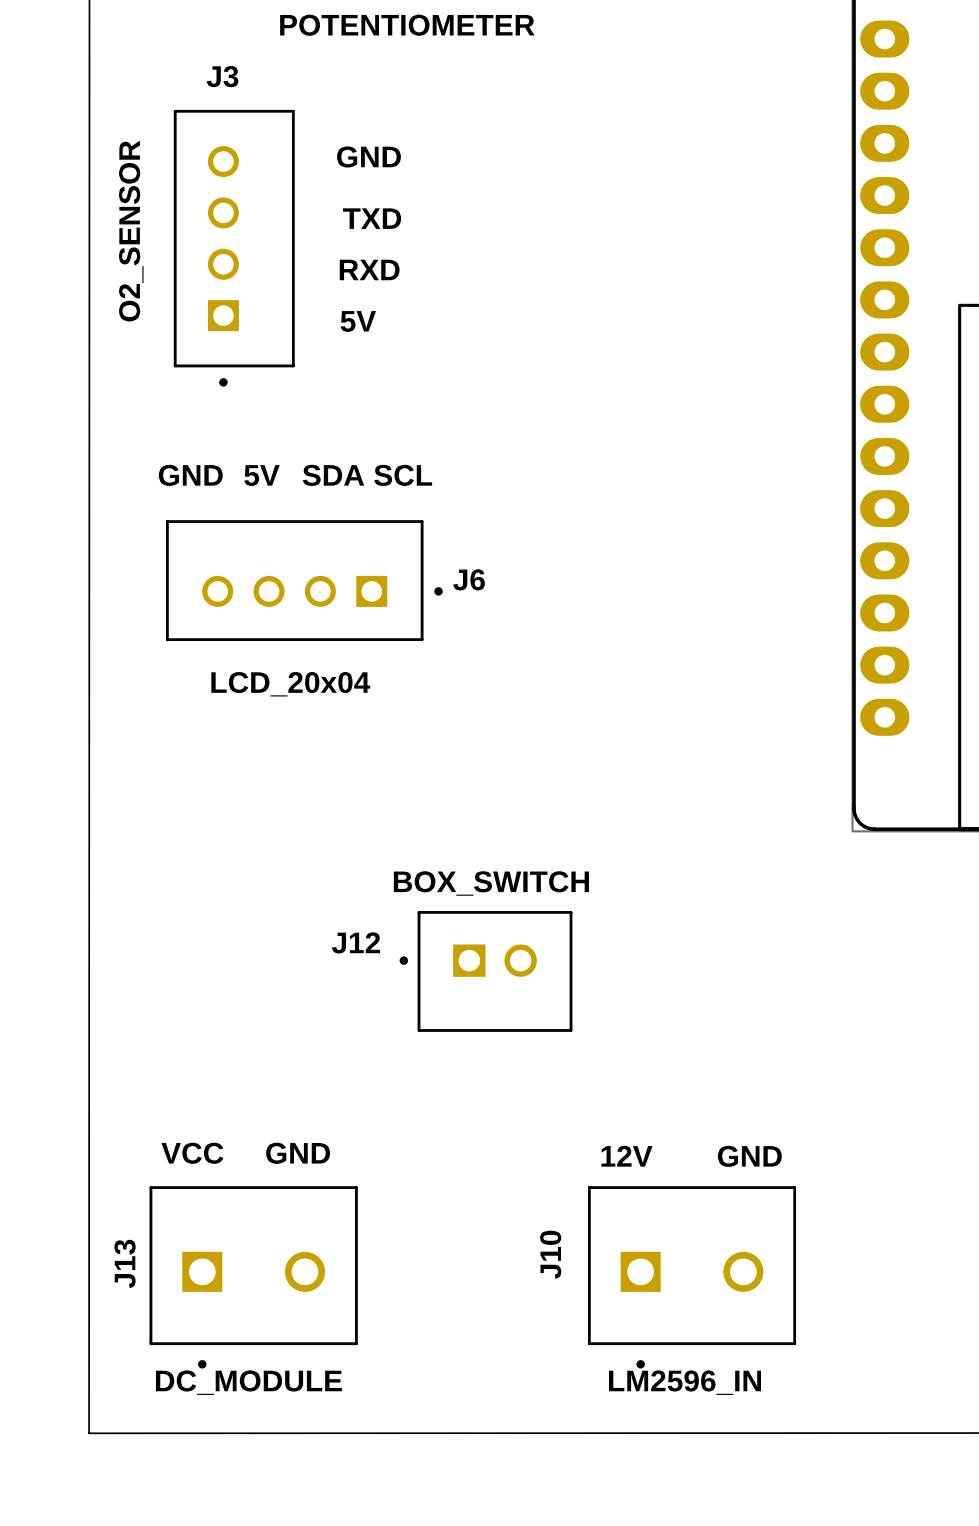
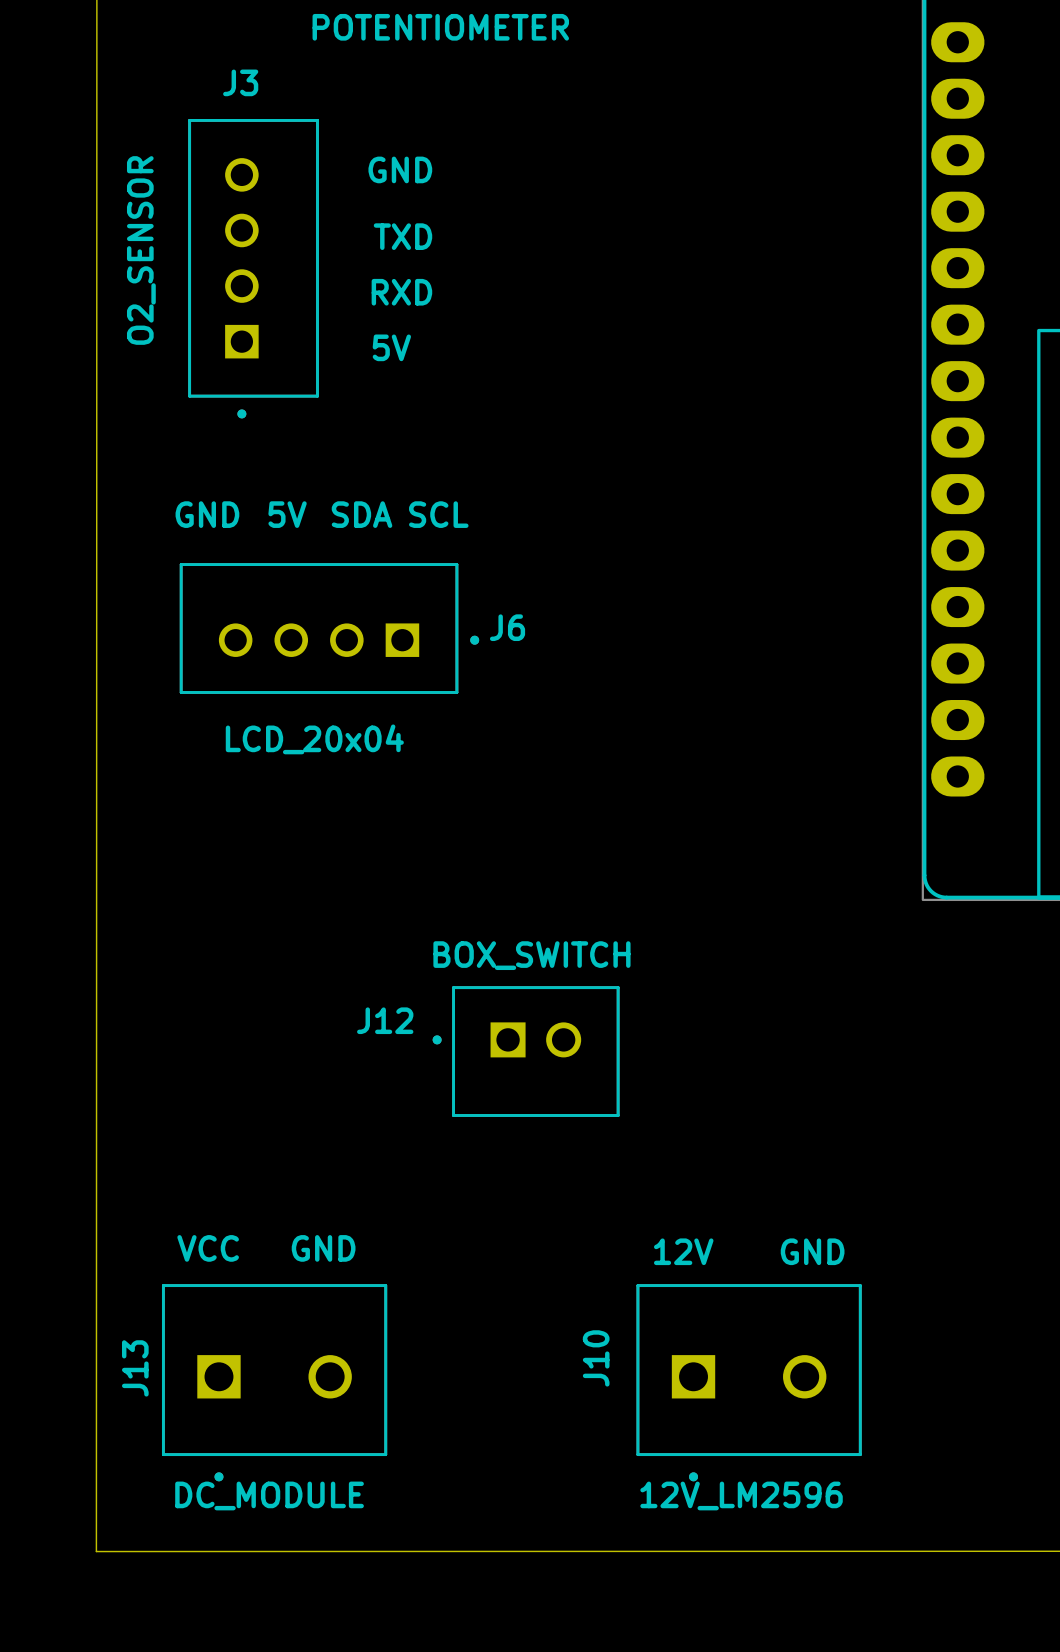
J10 value: LM2596_IN (685, 1382) -> 12V_LM2596 (741, 1495)

